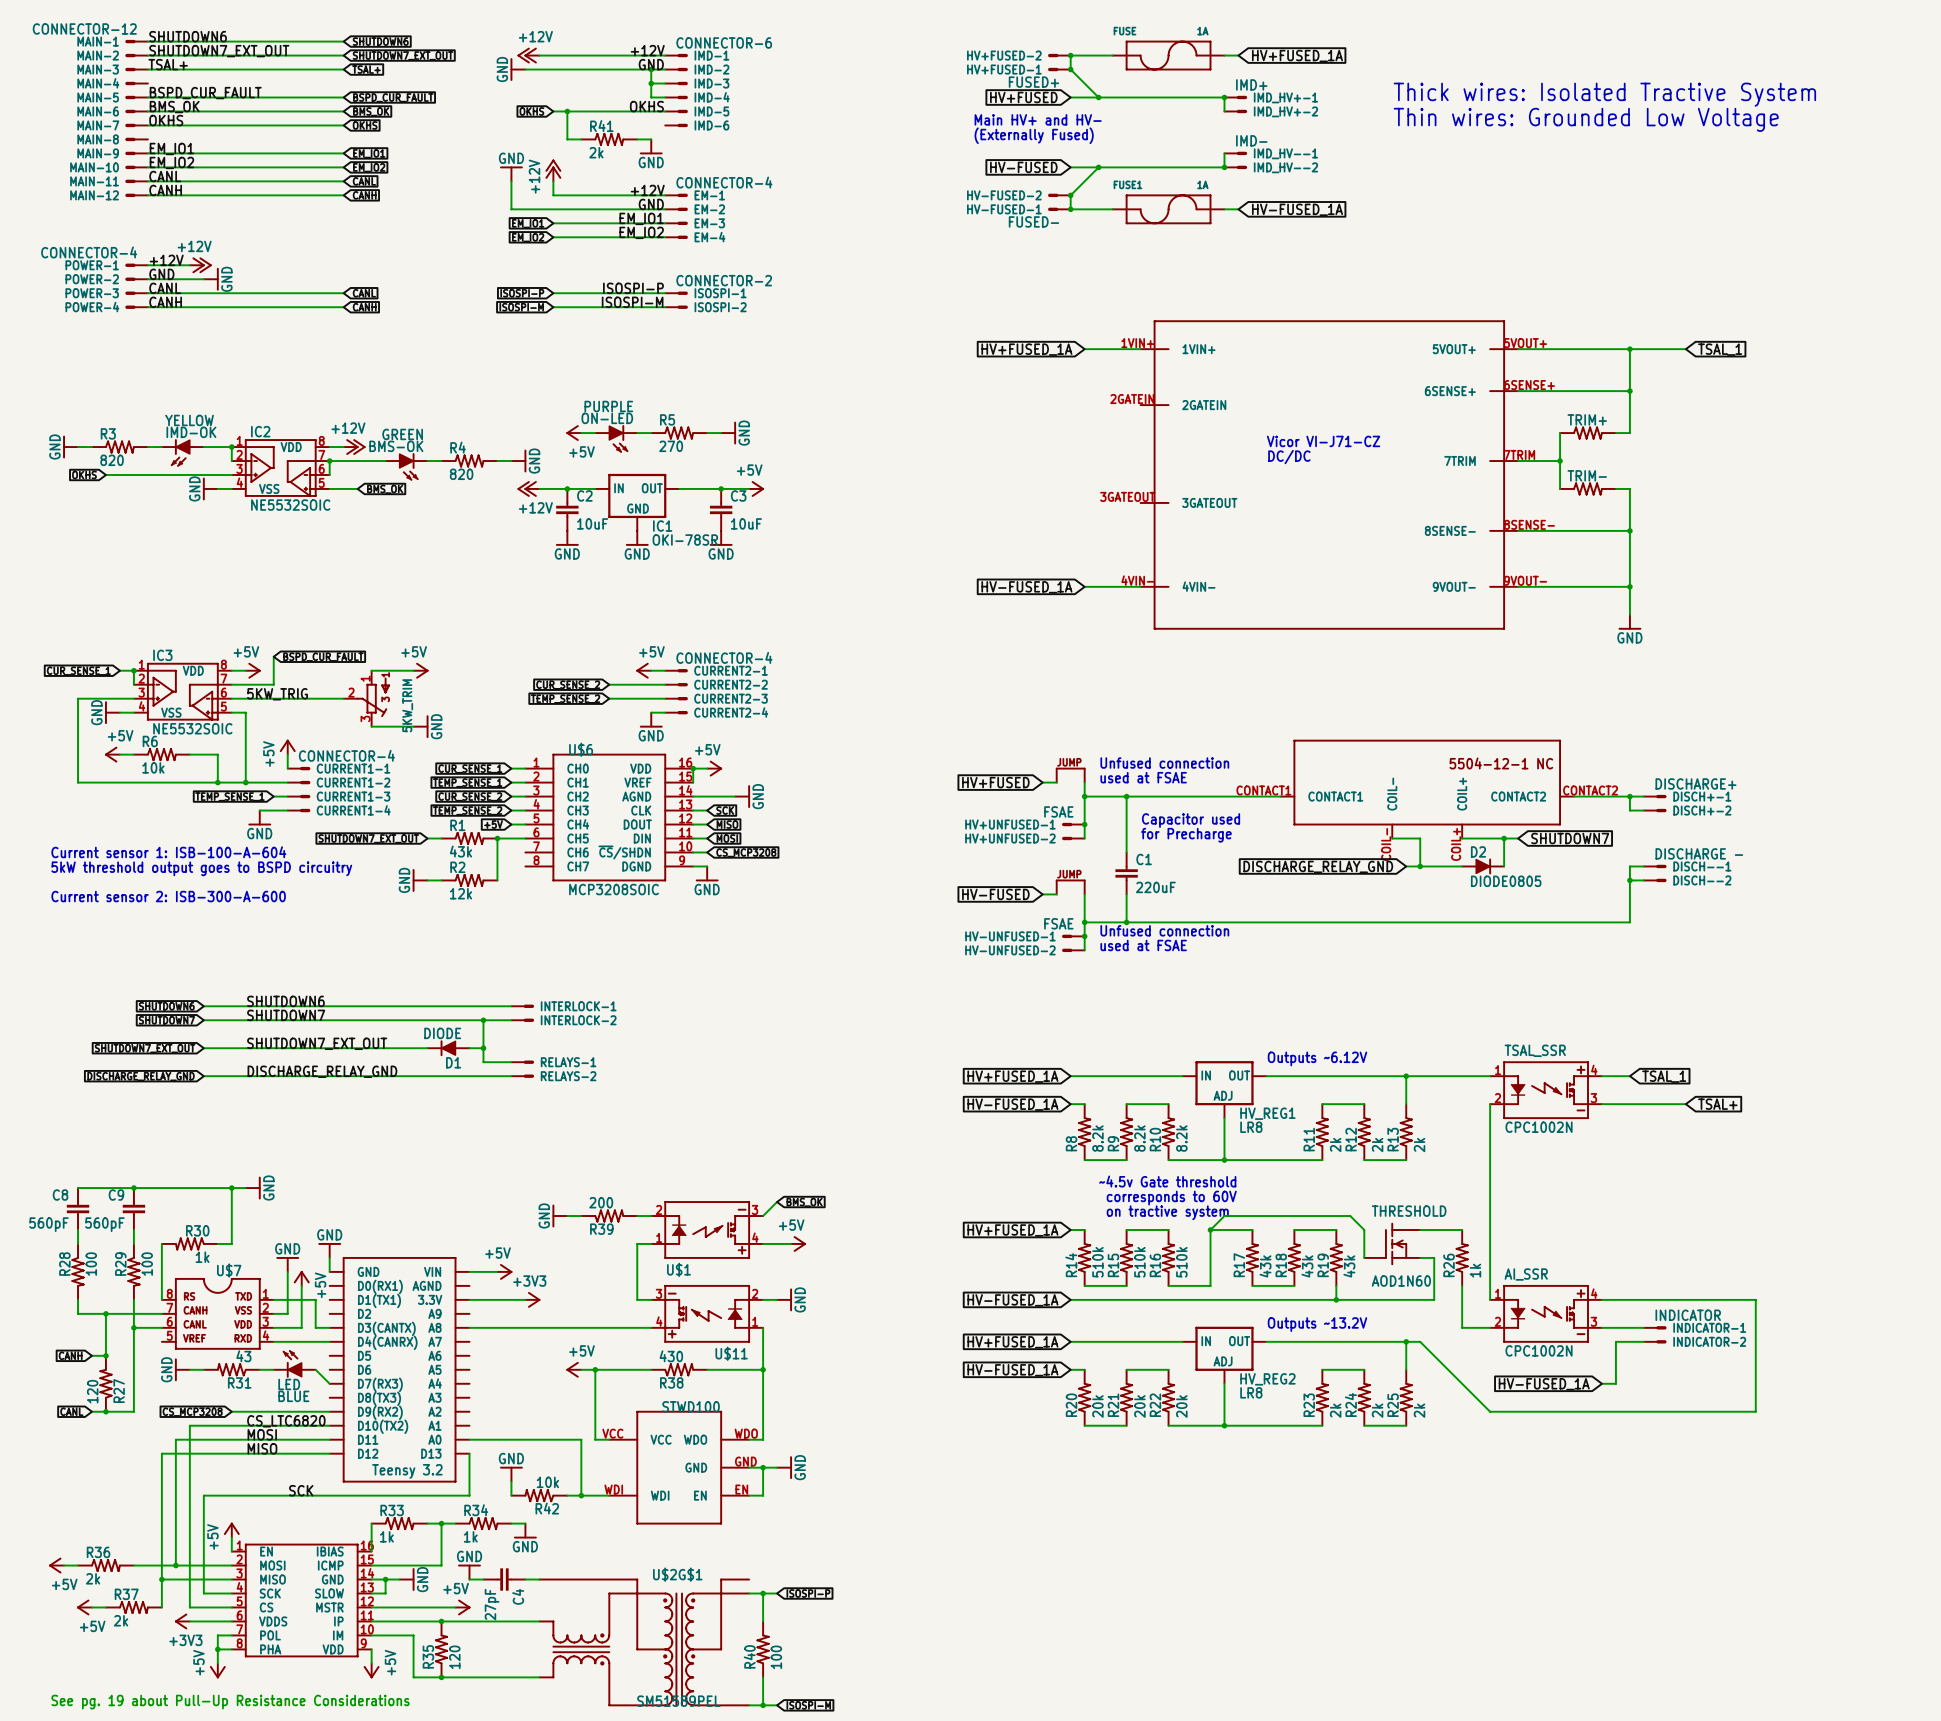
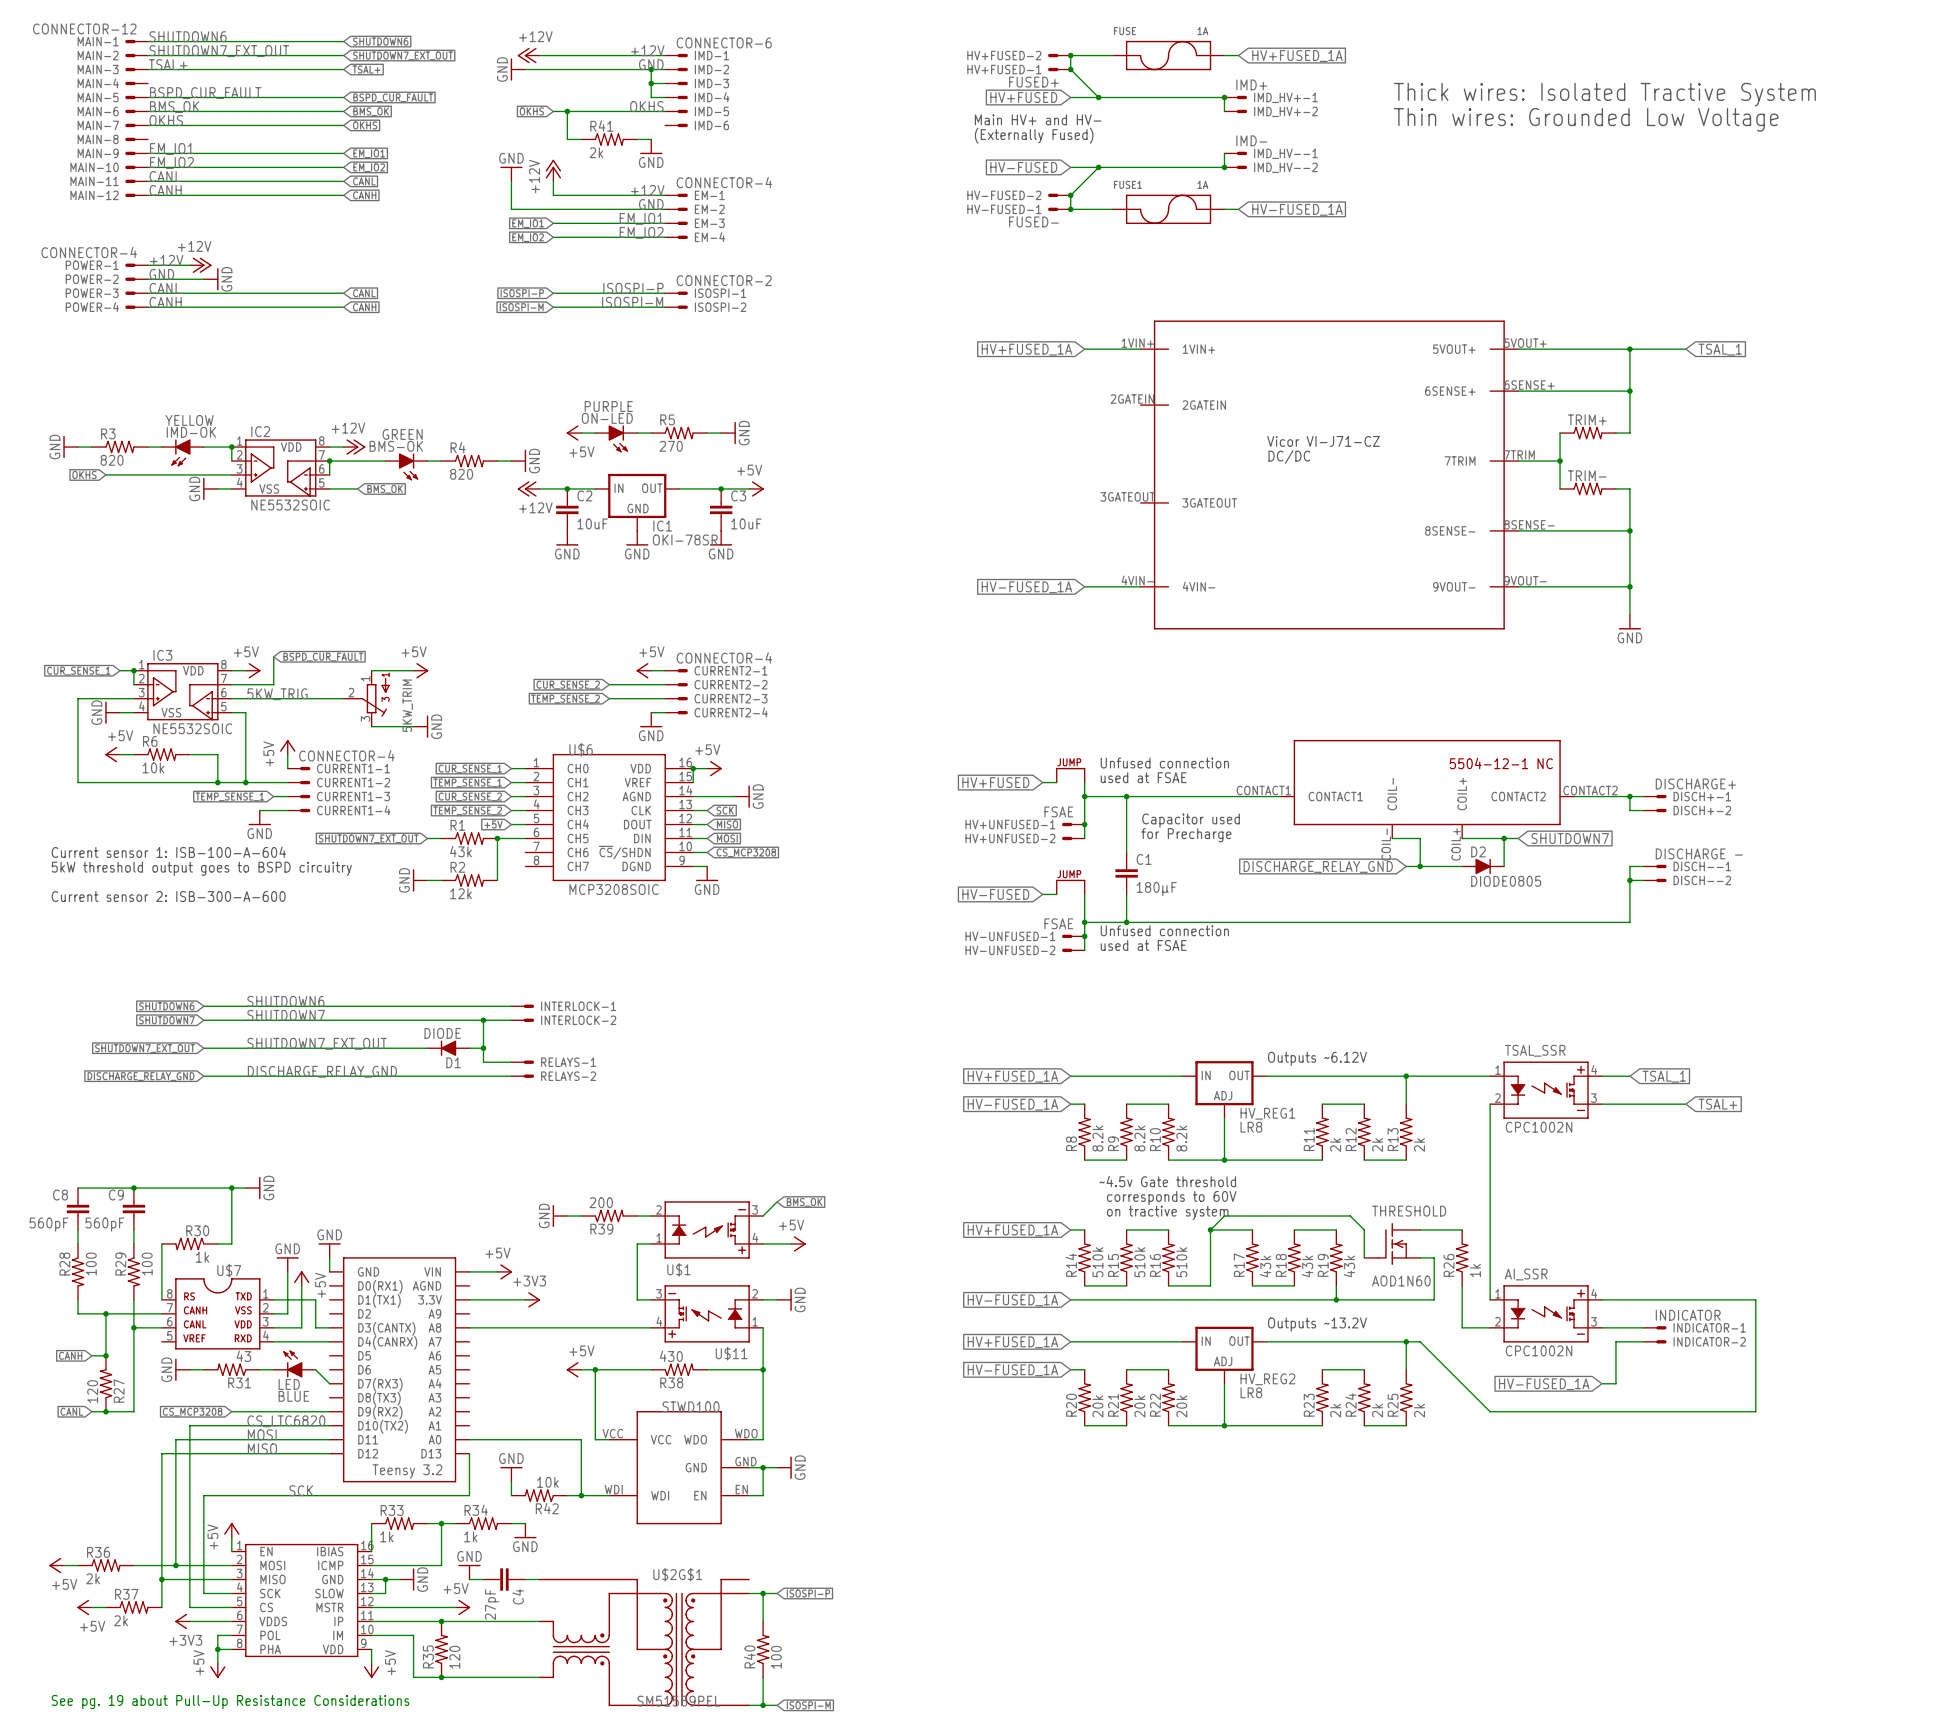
C1 value: 220uF (1155, 887) -> 180µF (1156, 889)

